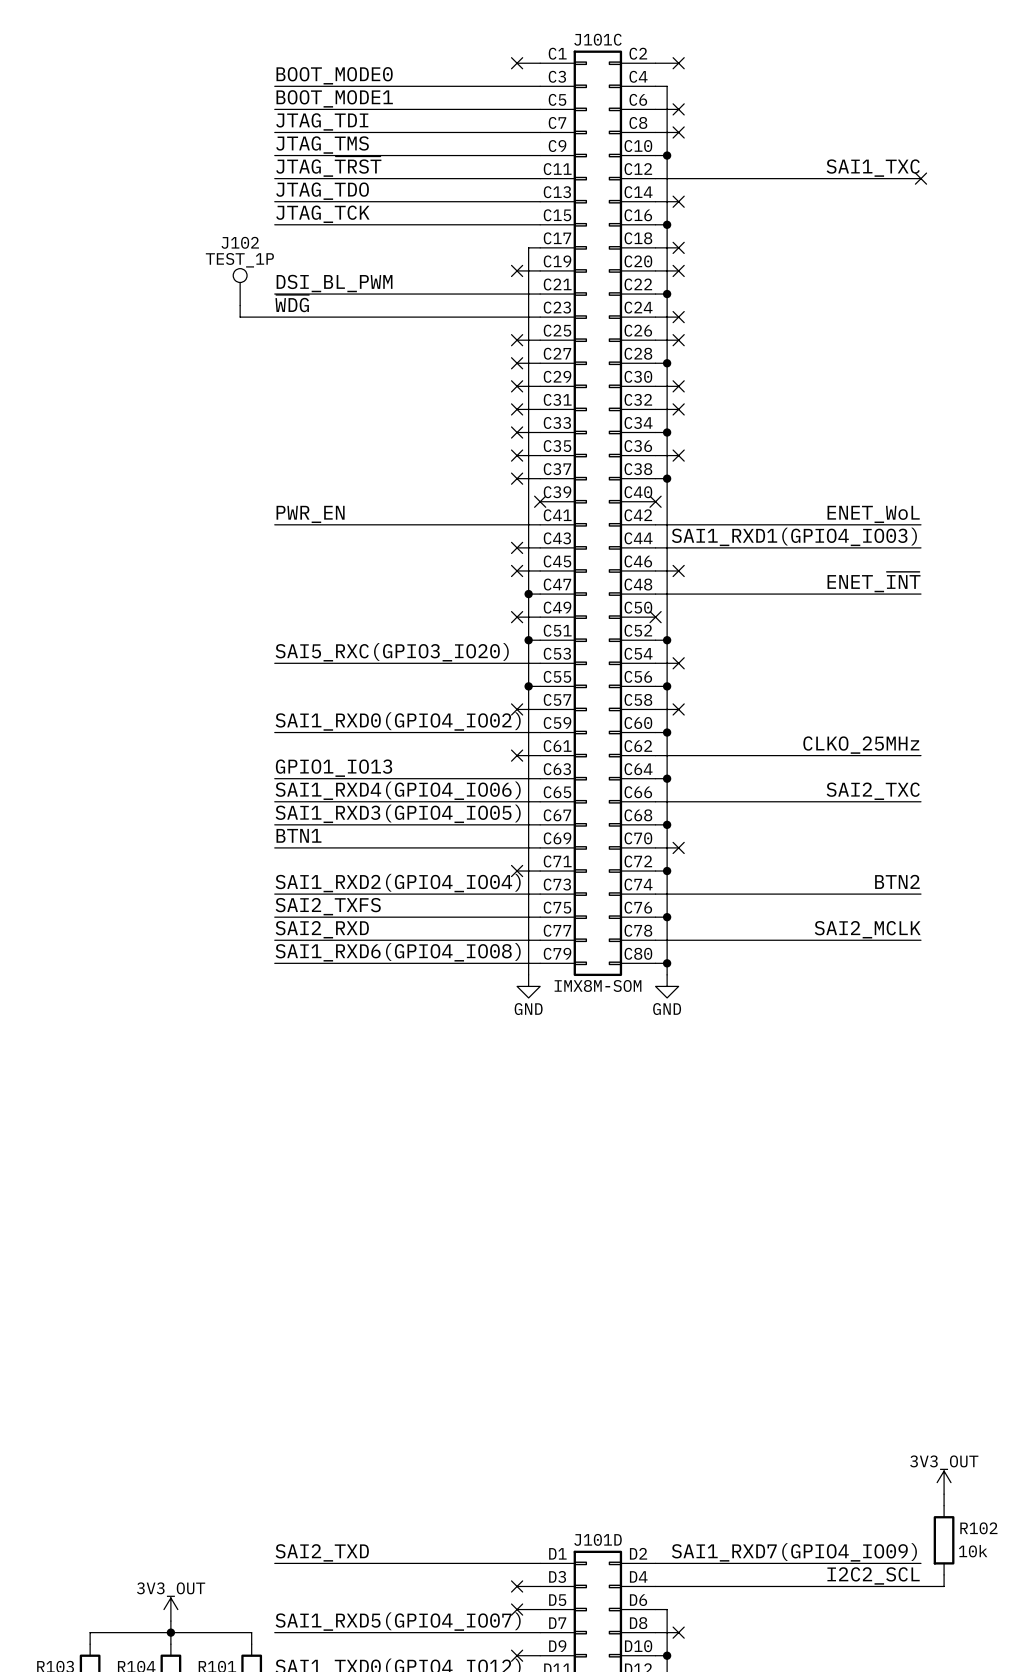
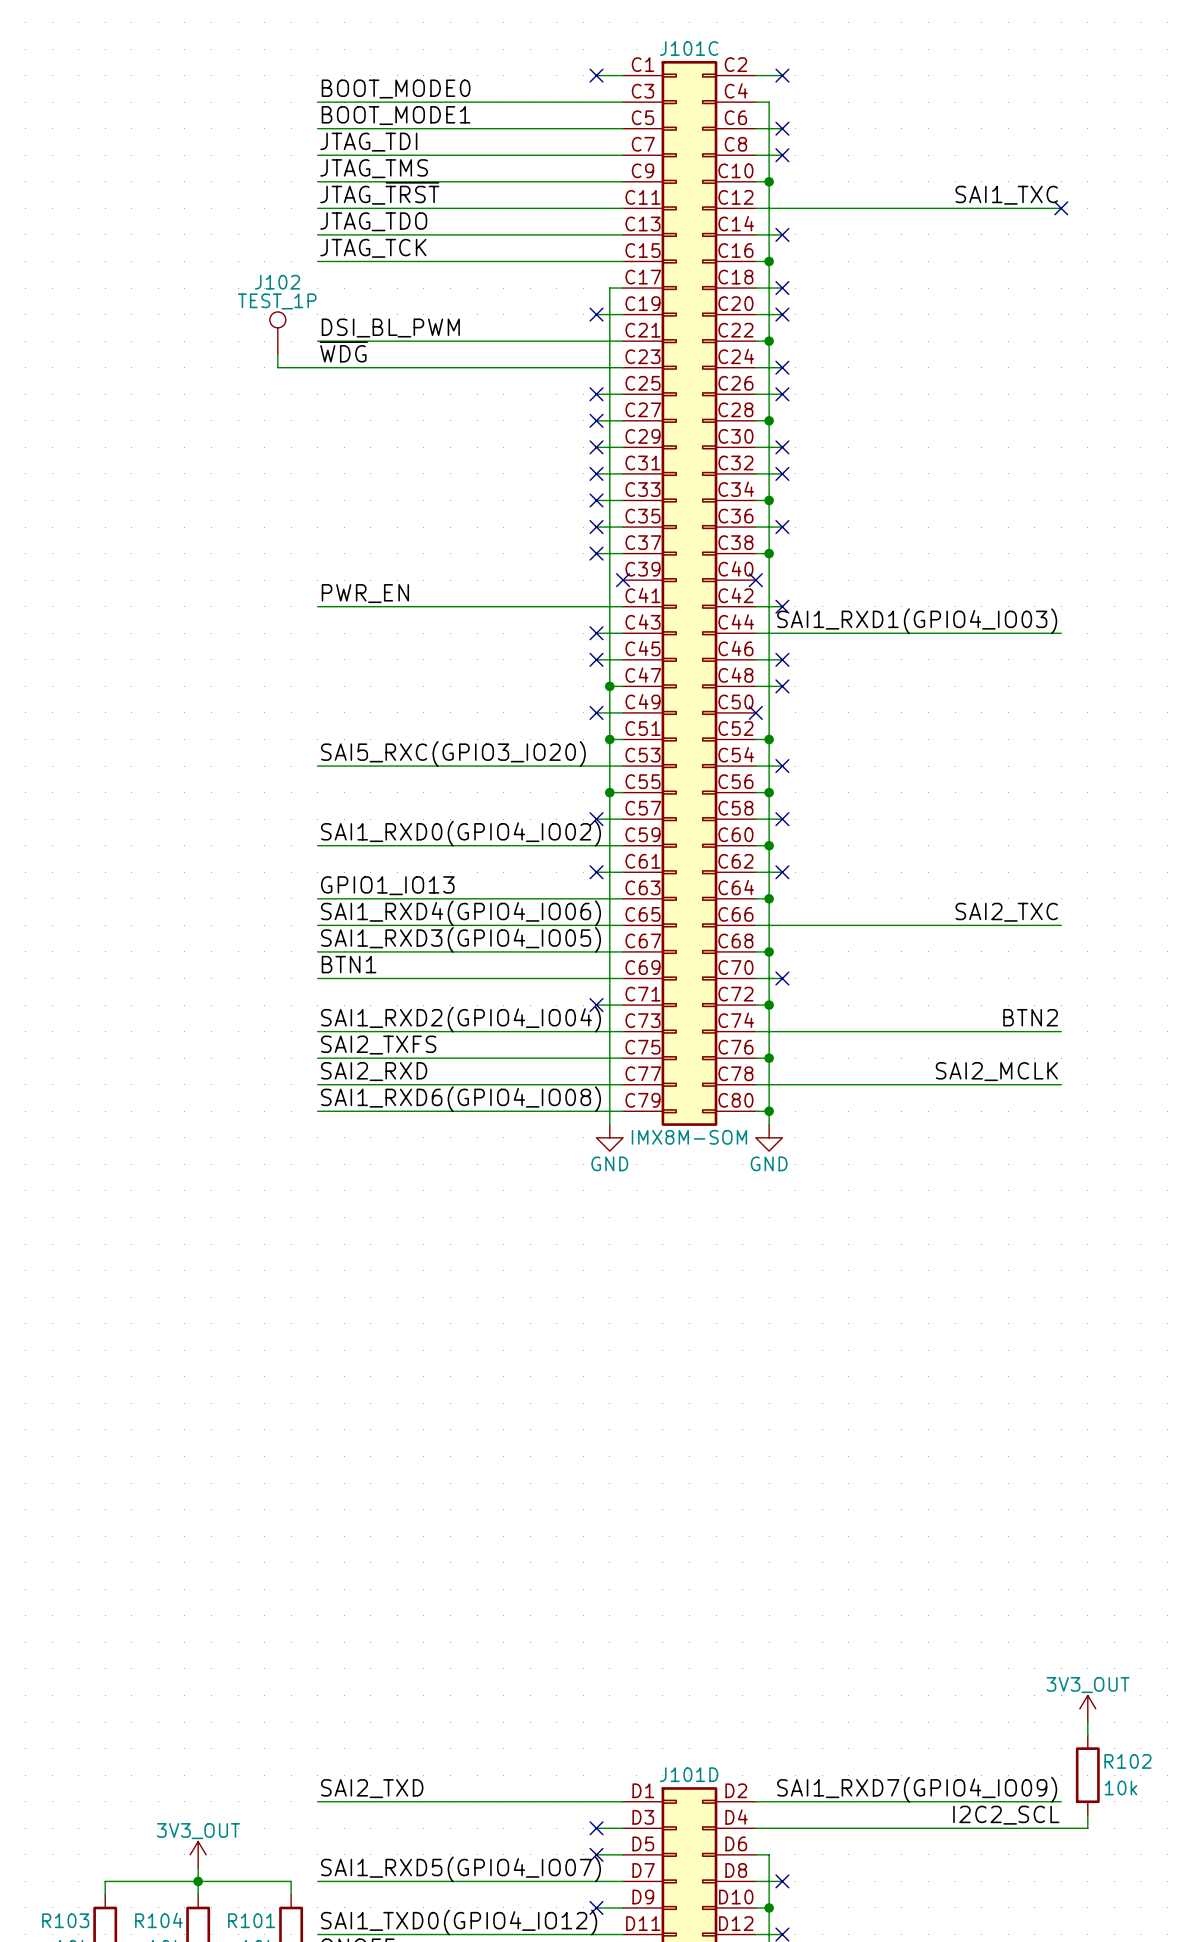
label: ENET_WoL (873, 514) -> none
wire: (678, 524) (920, 524) -> none
no-connect mark: none -> (782, 606)
label: ENET_~{INT} (874, 582) -> none
wire: (678, 594) (920, 594) -> none
no-connect mark: none -> (782, 686)
label: CLKO_25MHz (861, 745) -> none
wire: (678, 755) (920, 755) -> none
no-connect mark: none -> (782, 872)

